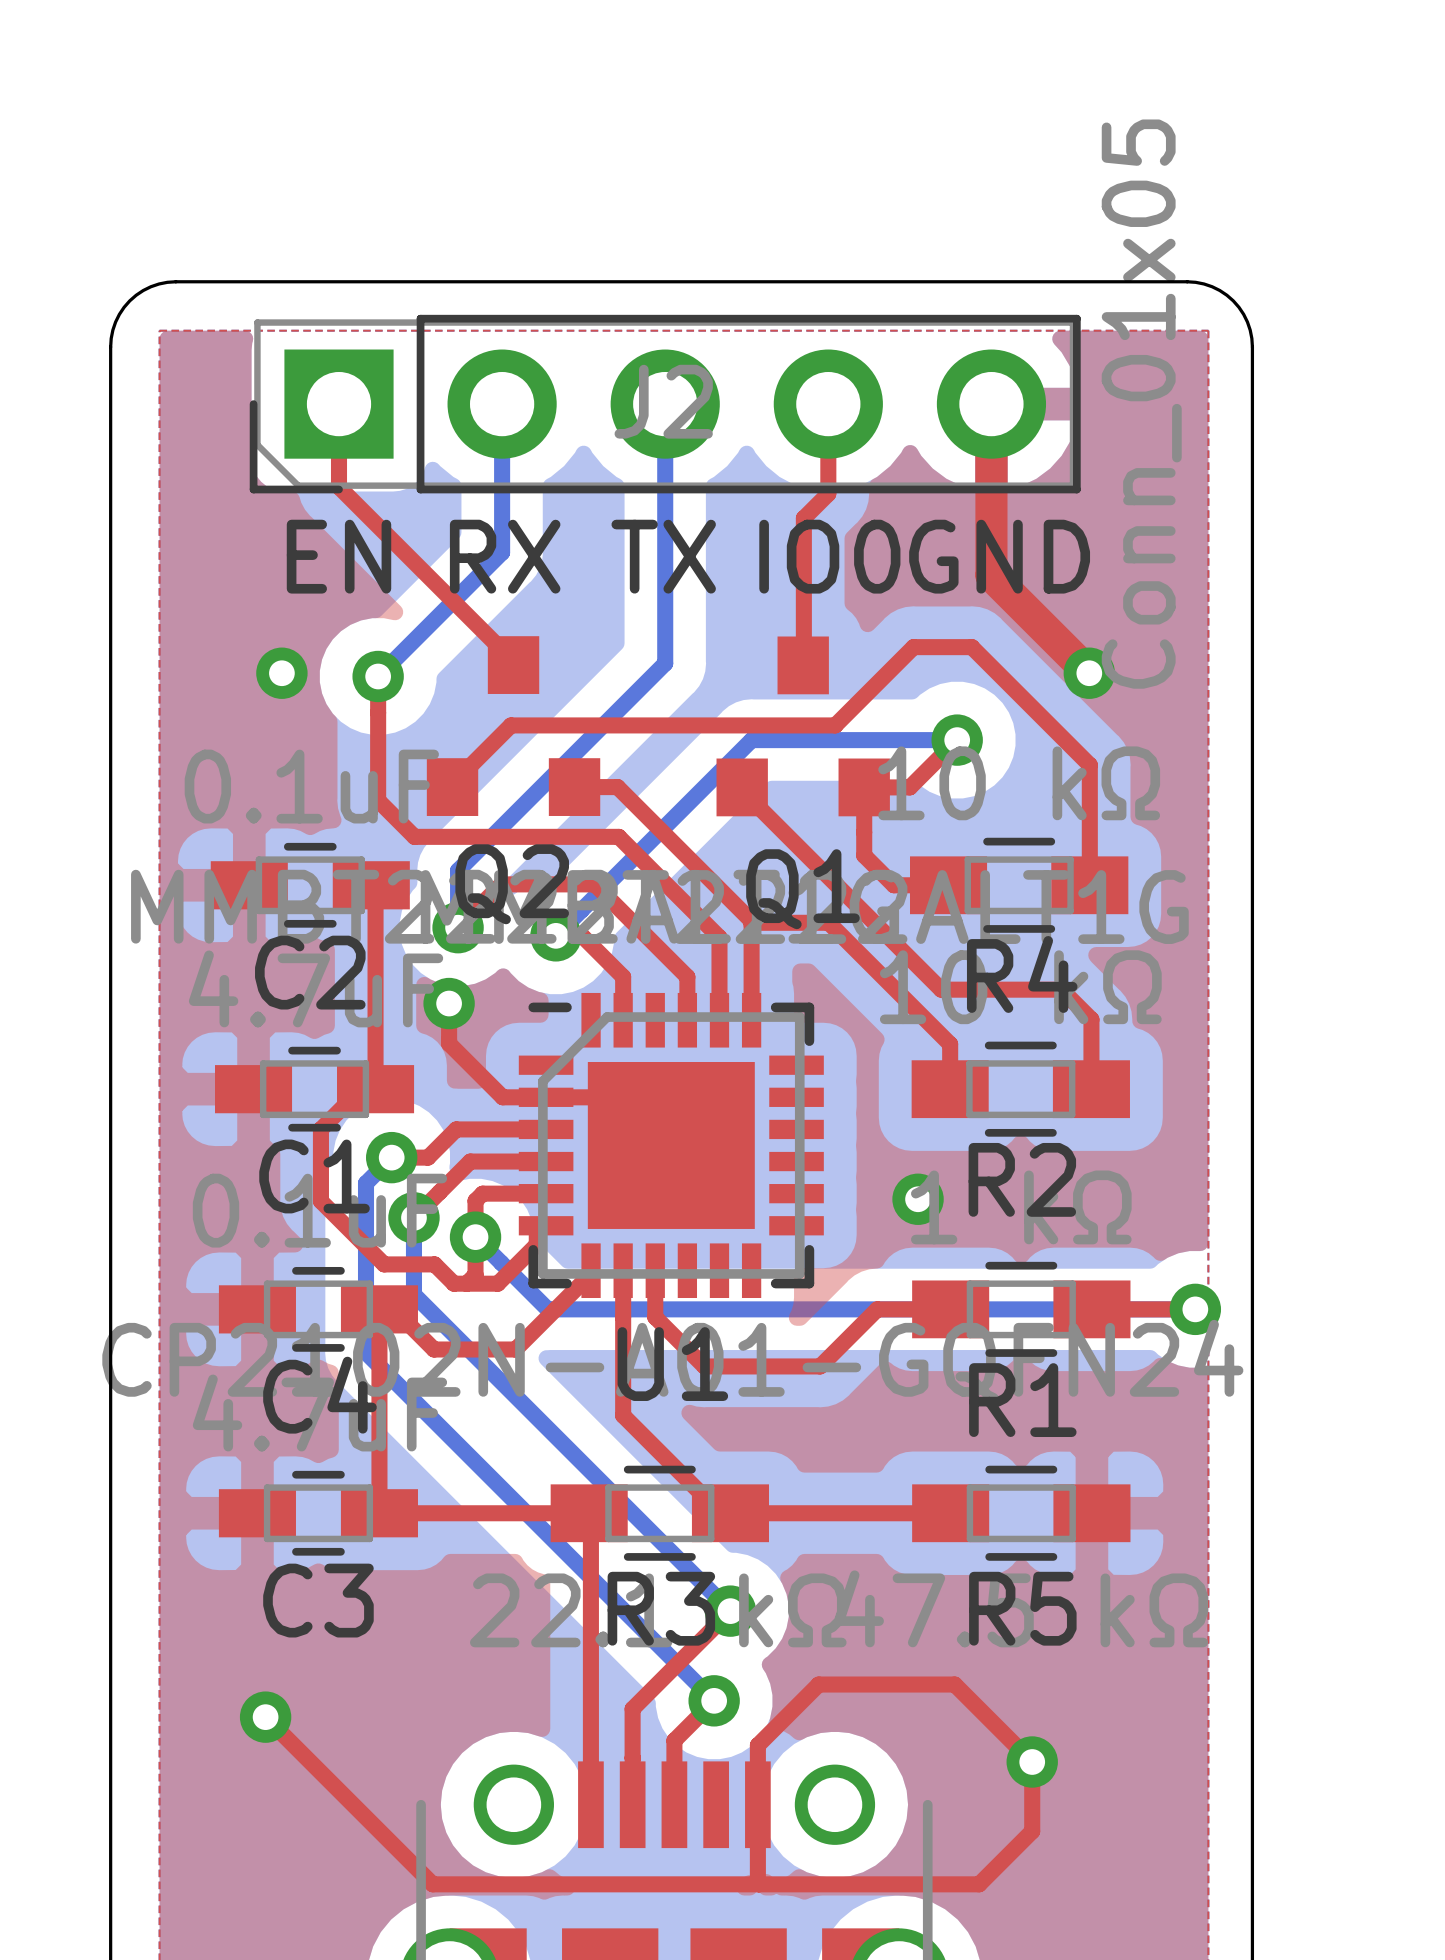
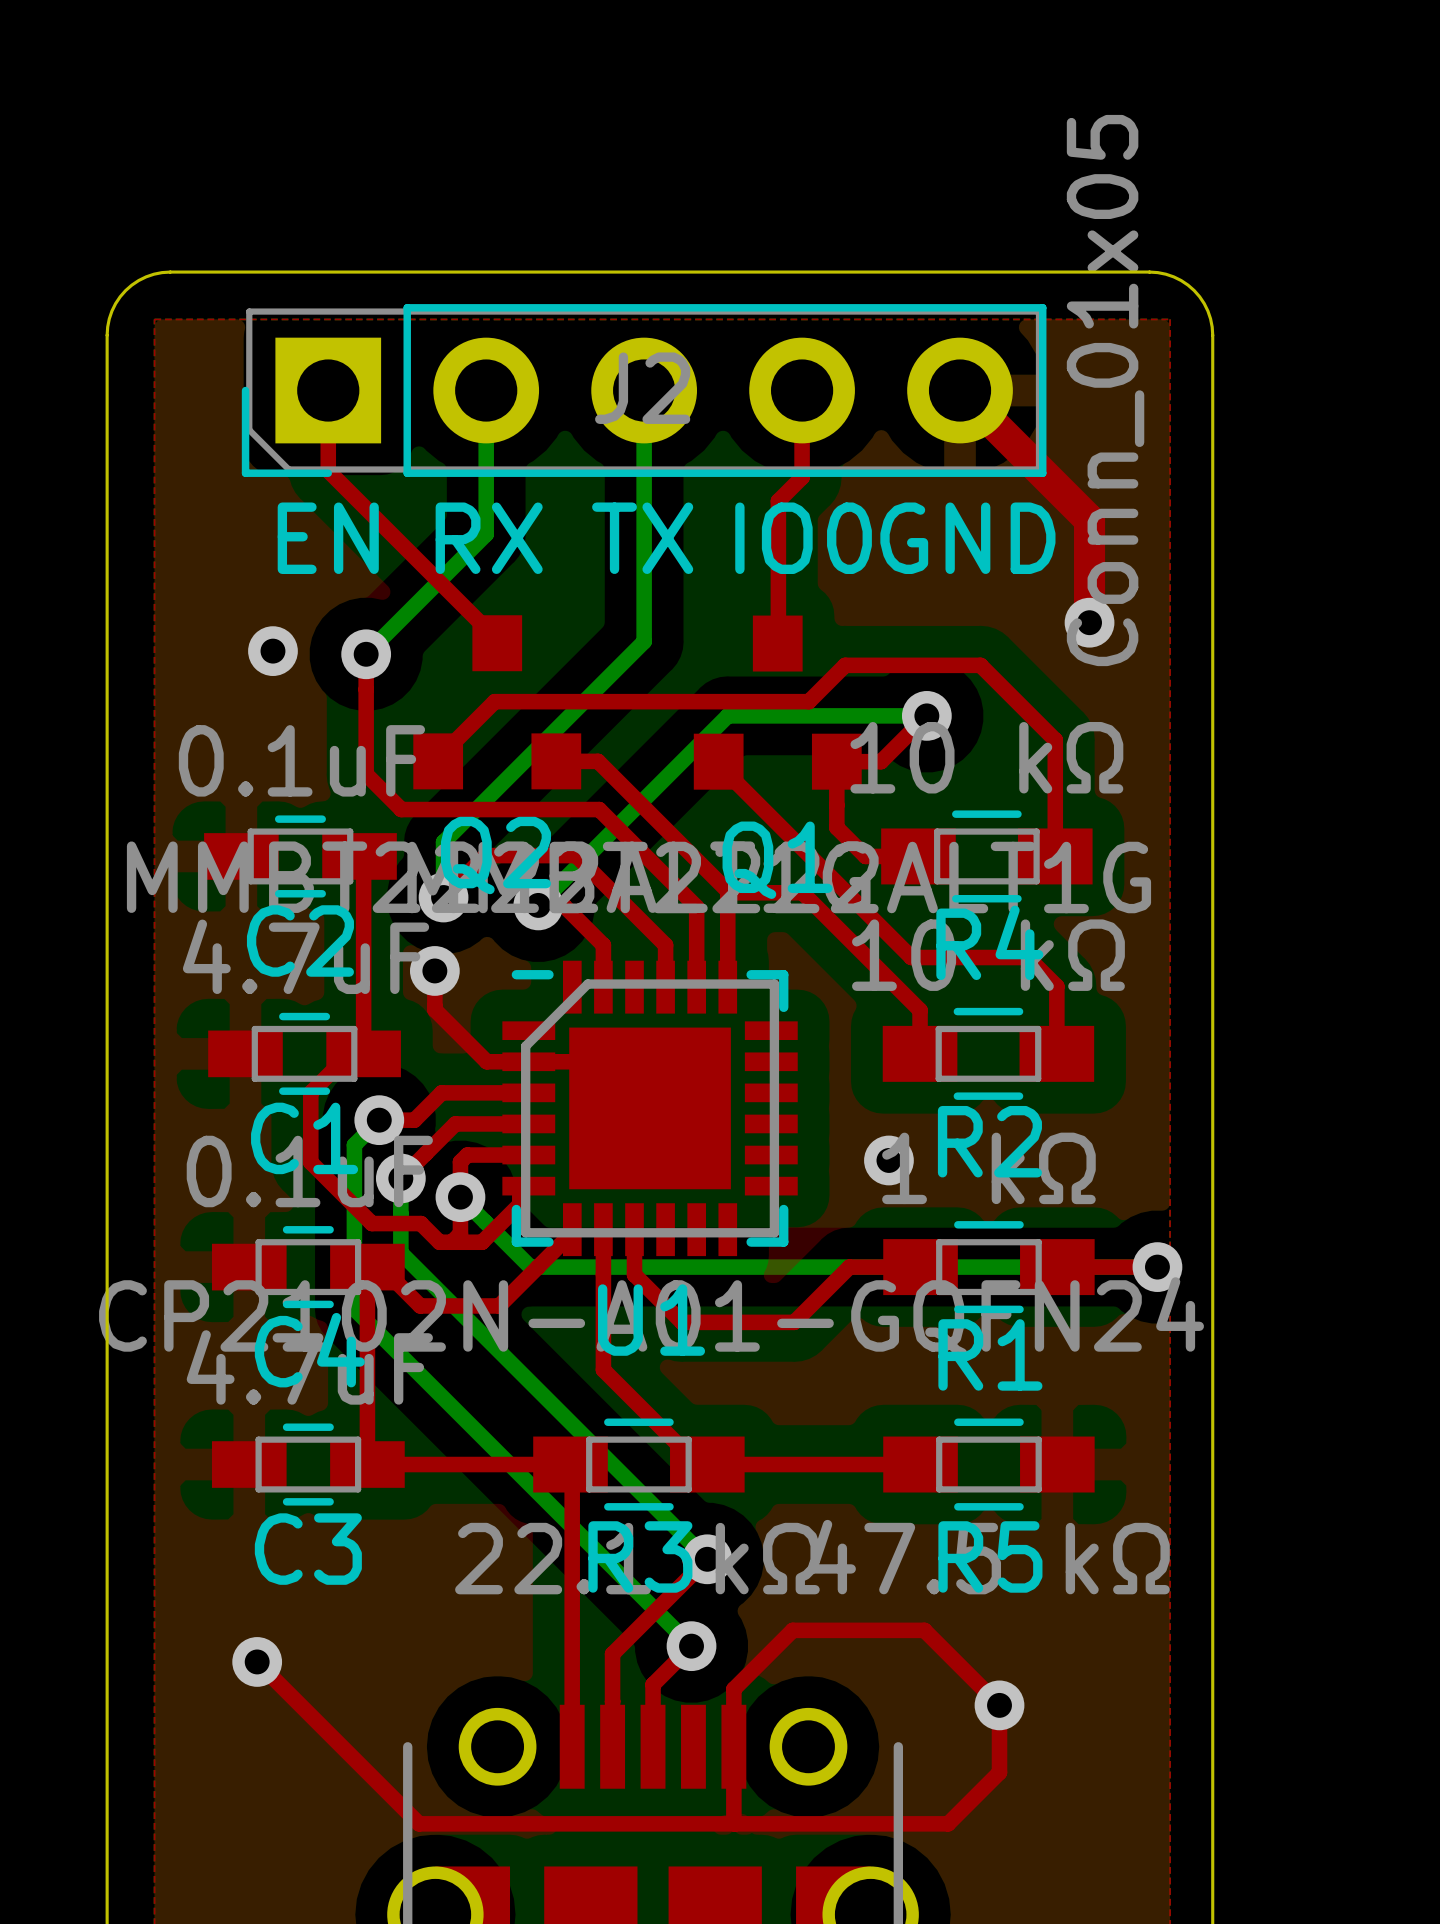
top track: (991, 404) (991, 575) (1089, 673) -> (960, 390) (1089, 520) (1089, 622)
via position: (1089, 673) -> (1089, 622)
top track: (872, 687) (913, 647) (971, 647) (1012, 687) -> (845, 665) (980, 665)

